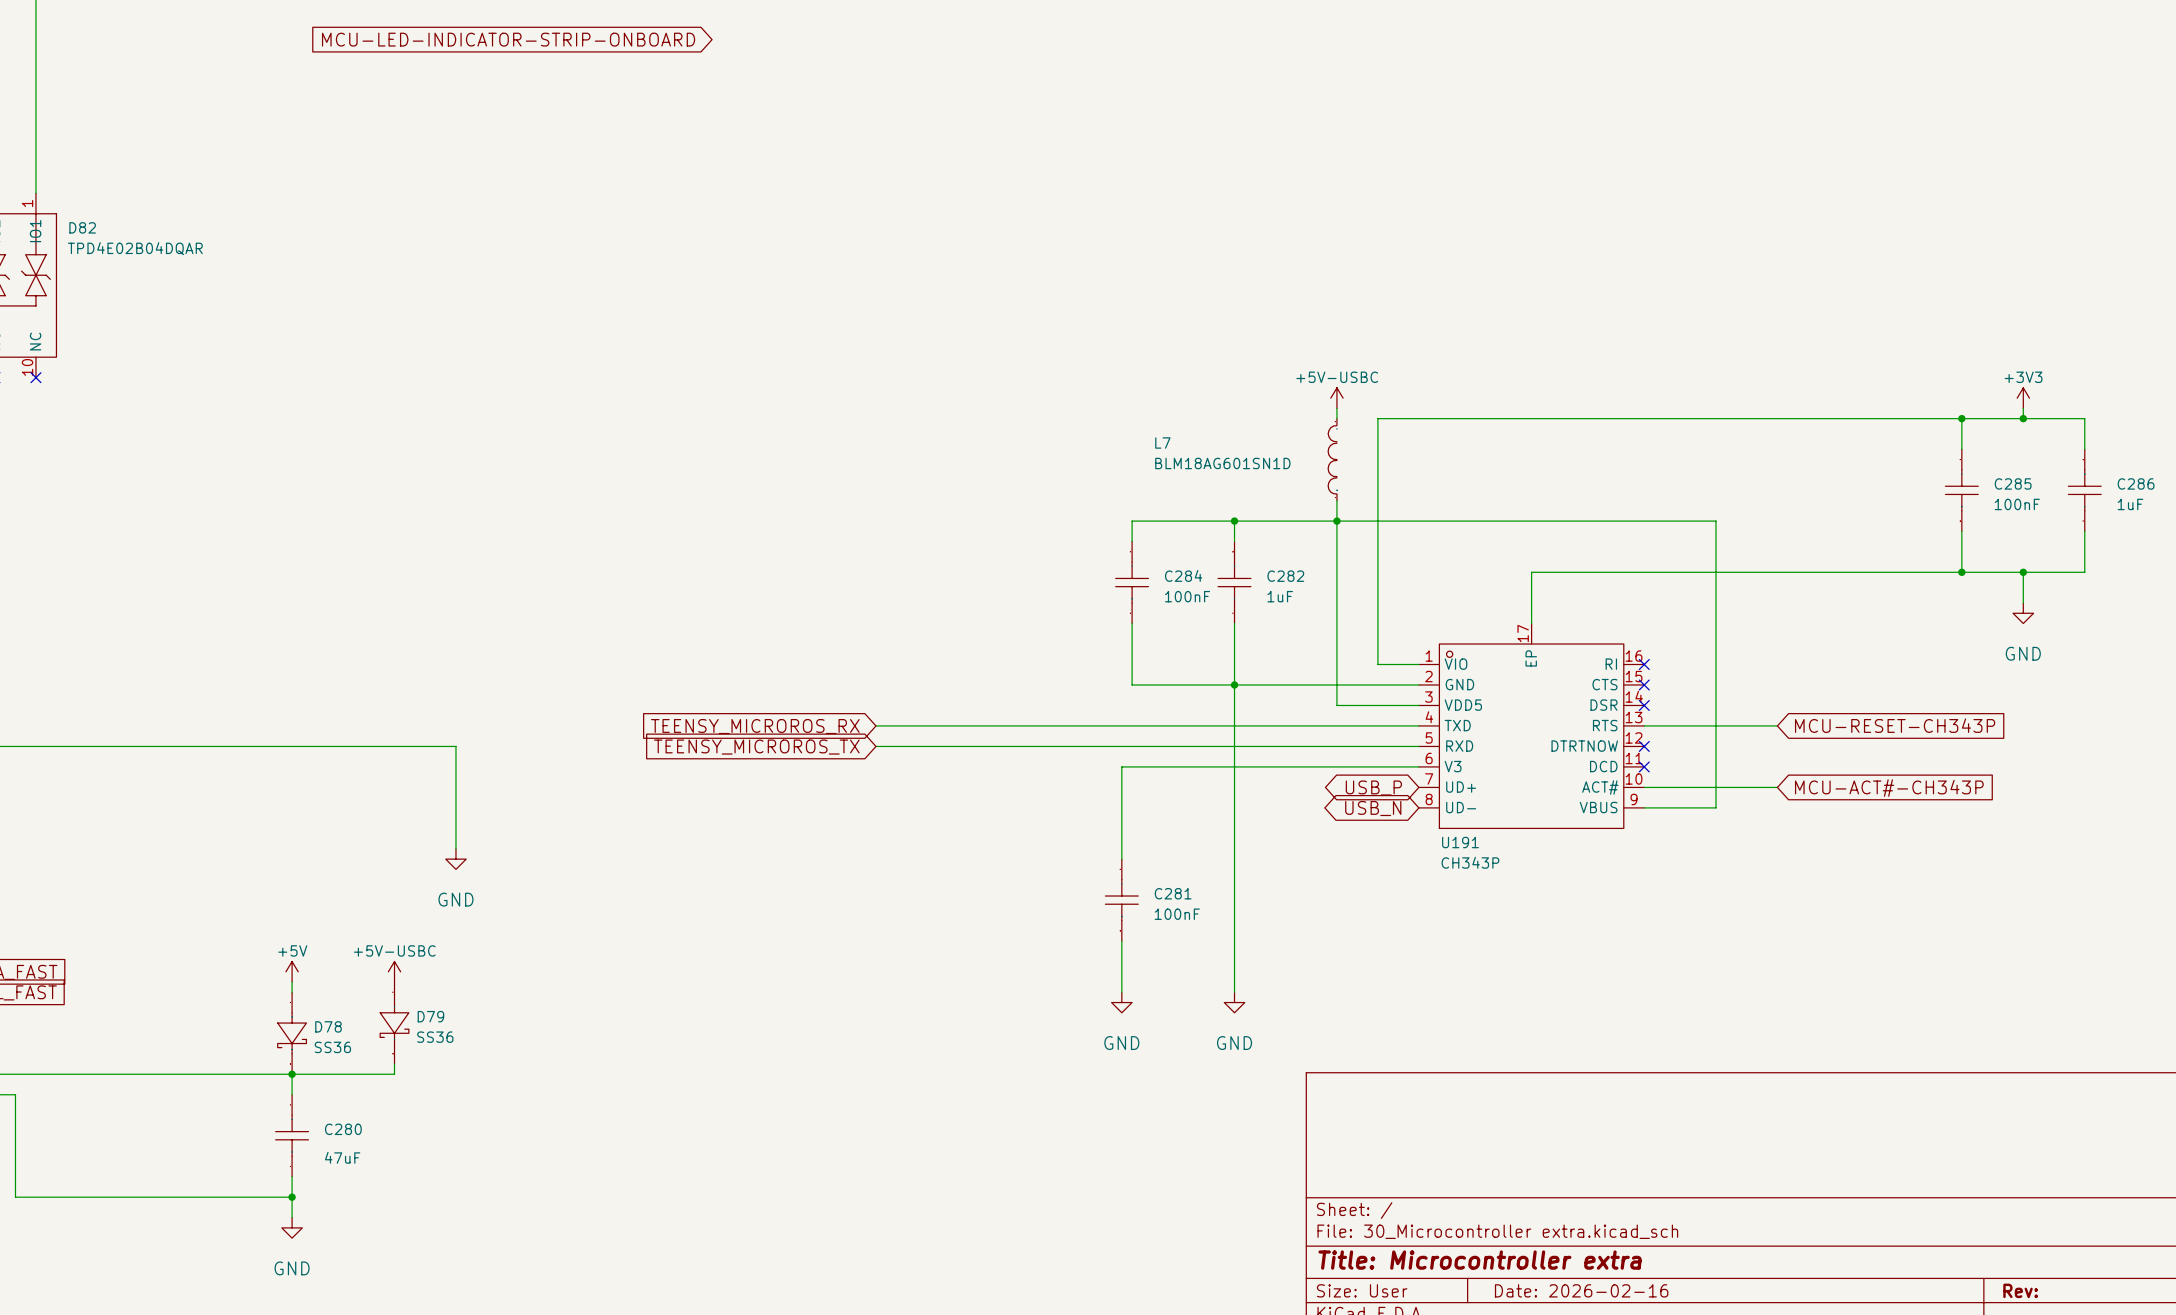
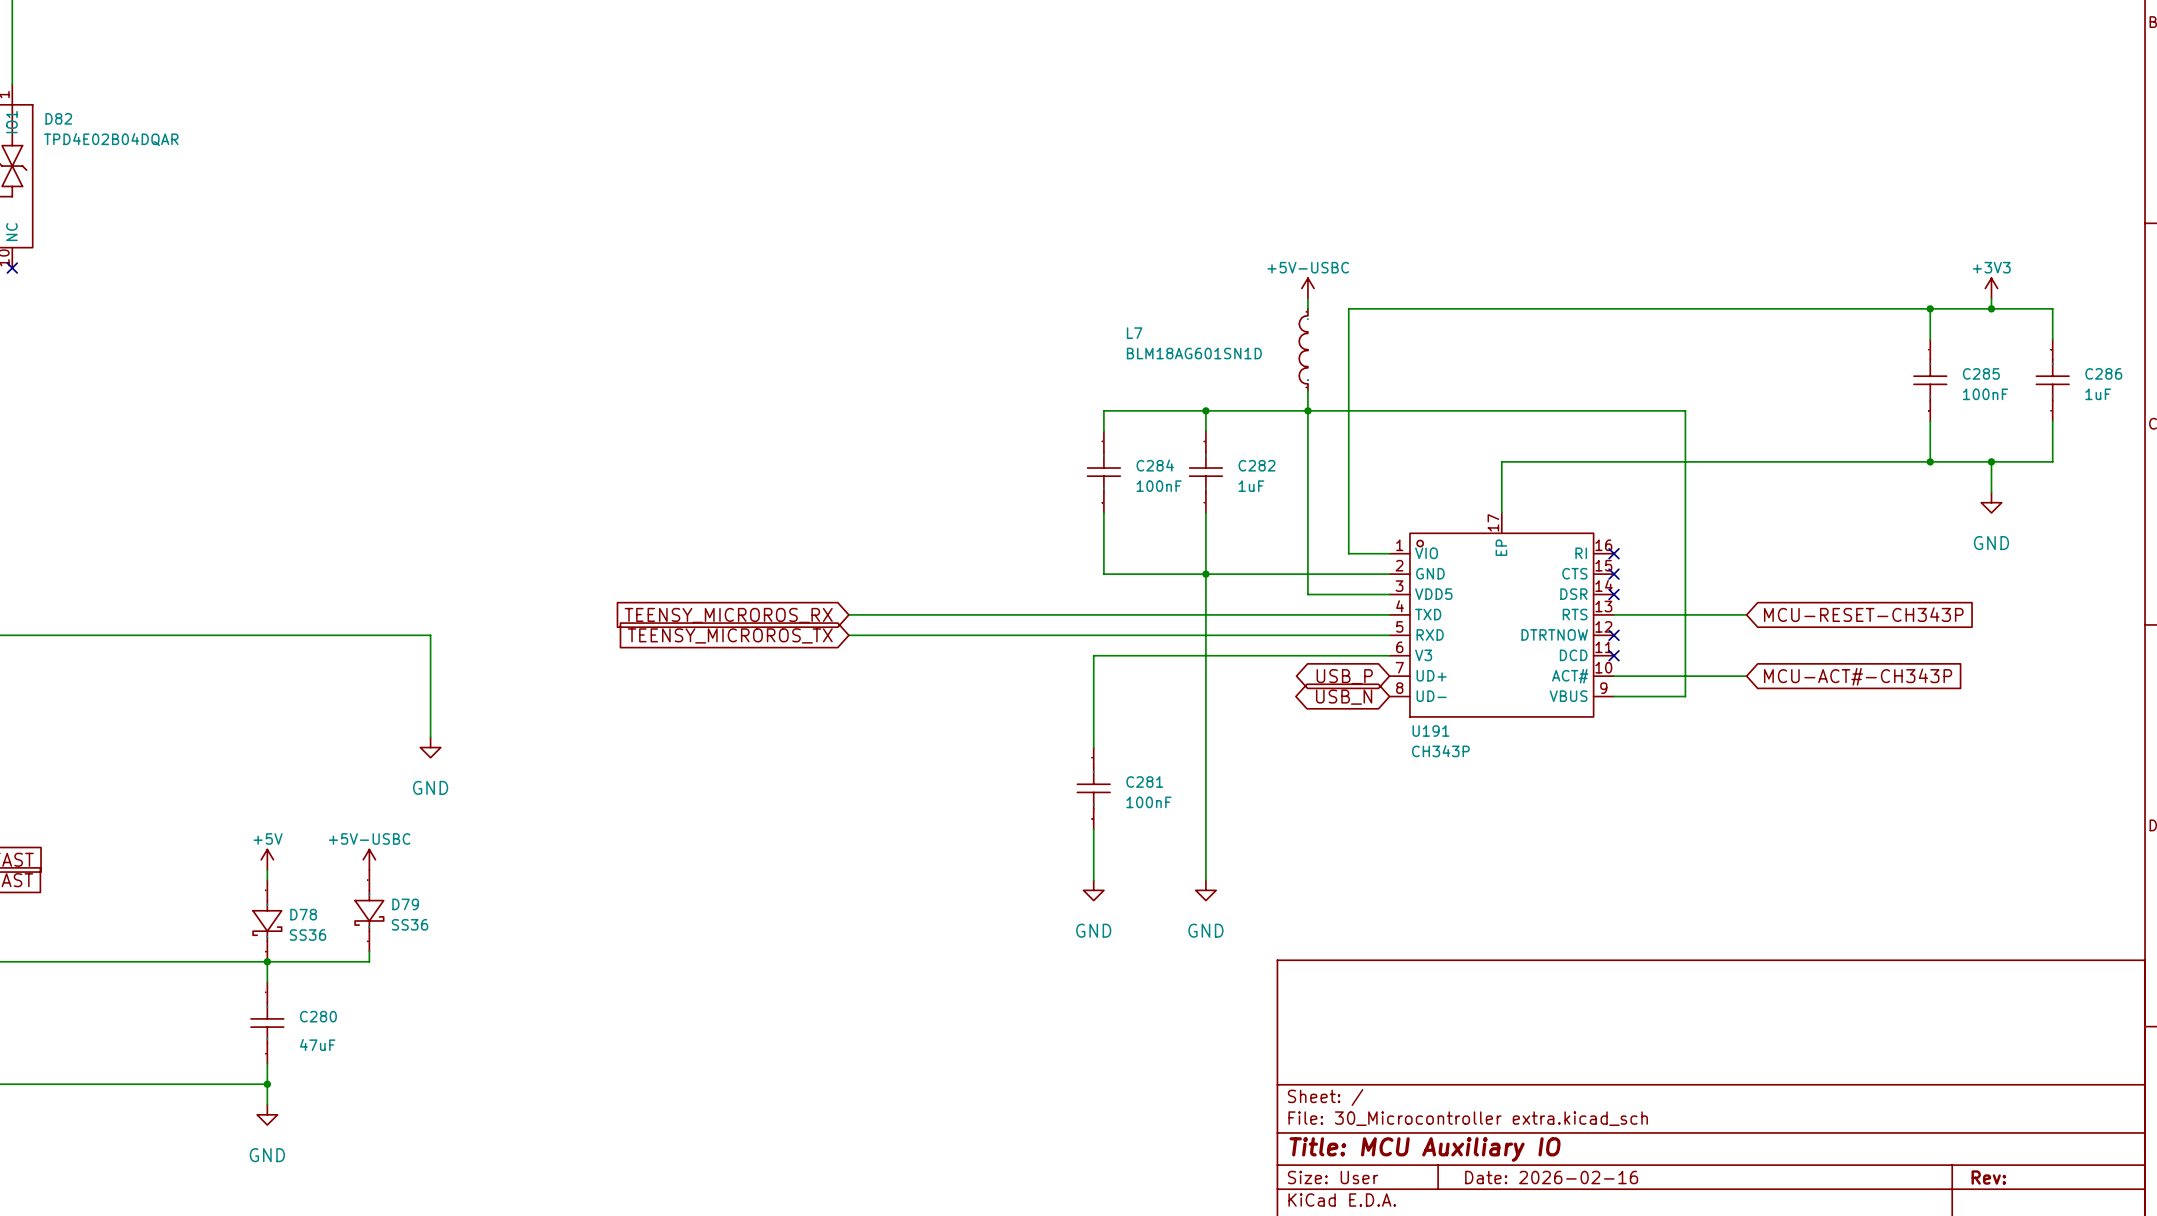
title block: Title: Microcontroller extra (1480, 1260) -> Title: MCU Auxiliary IO (1425, 1149)

